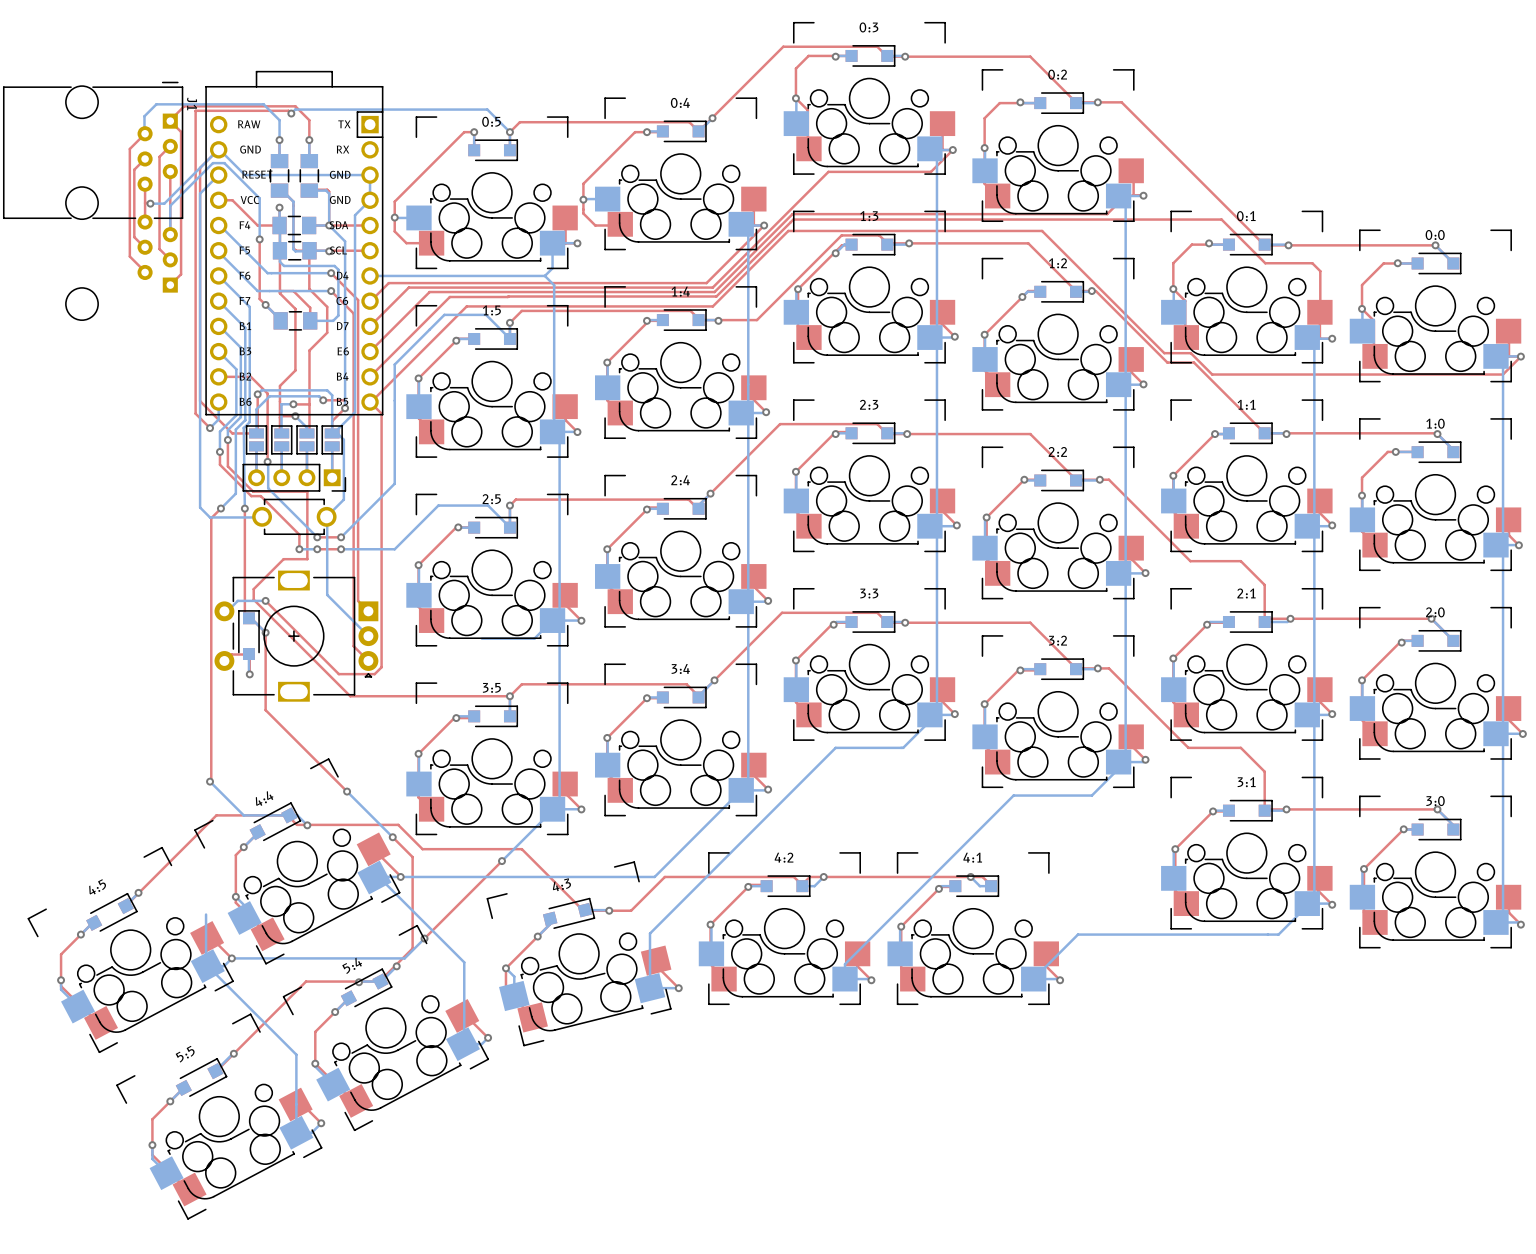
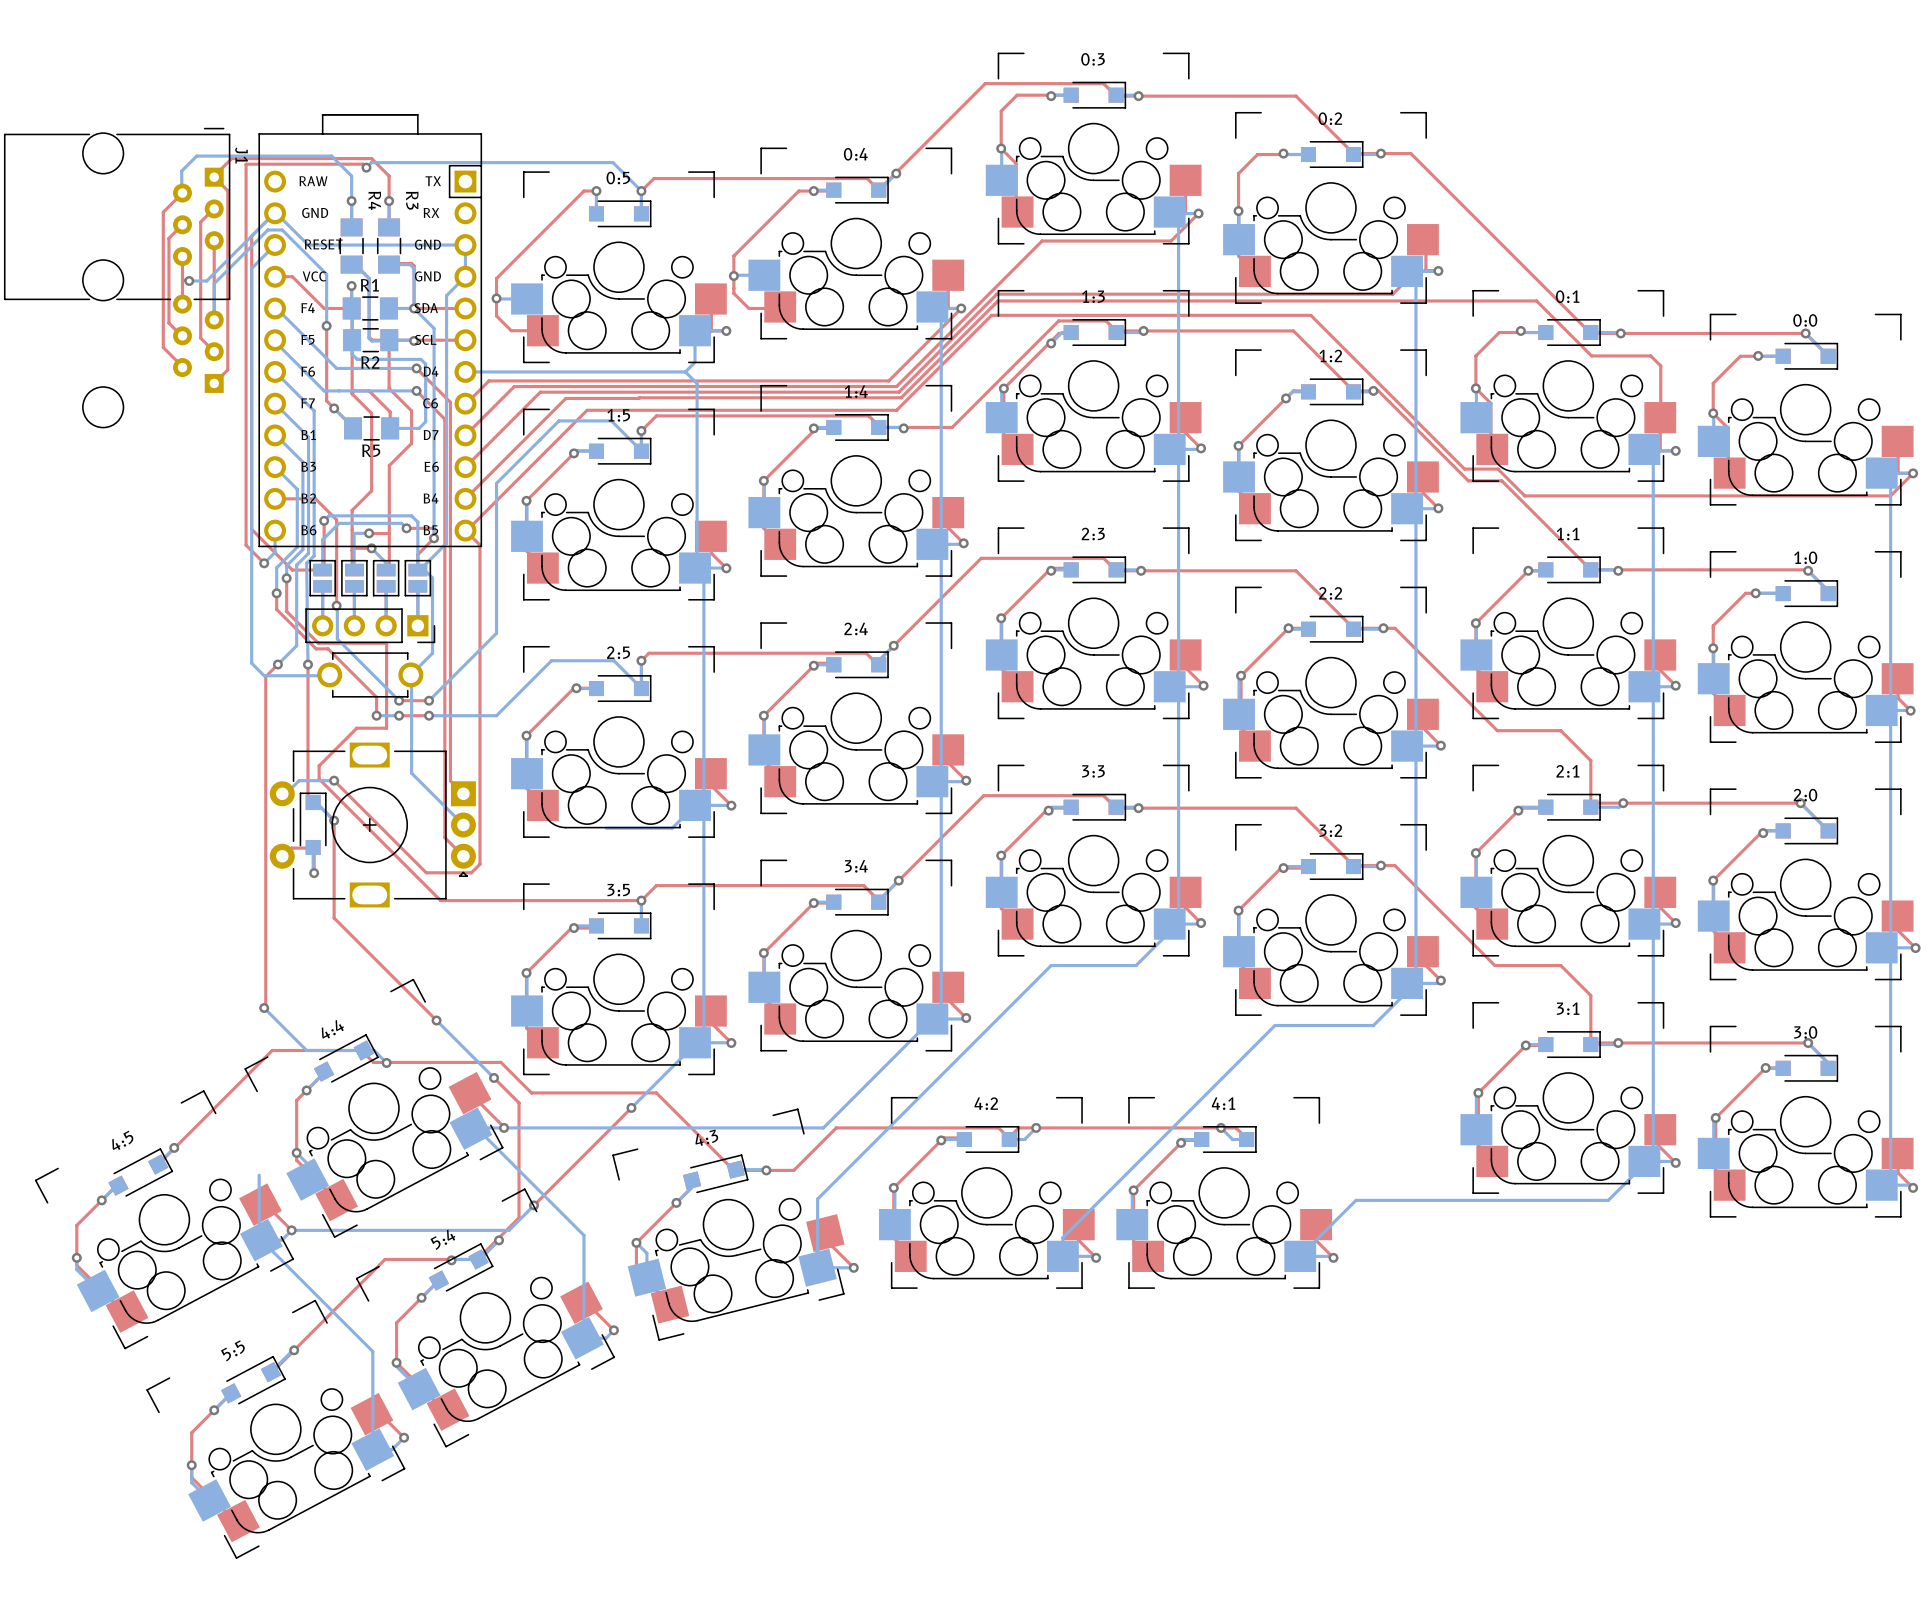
R4 name: none -> R4 (374, 200)
R3 name: none -> R3 (412, 200)
R1 name: none -> R1 (369, 285)
R2 name: none -> R2 (370, 362)
R5 name: none -> R5 (371, 450)

